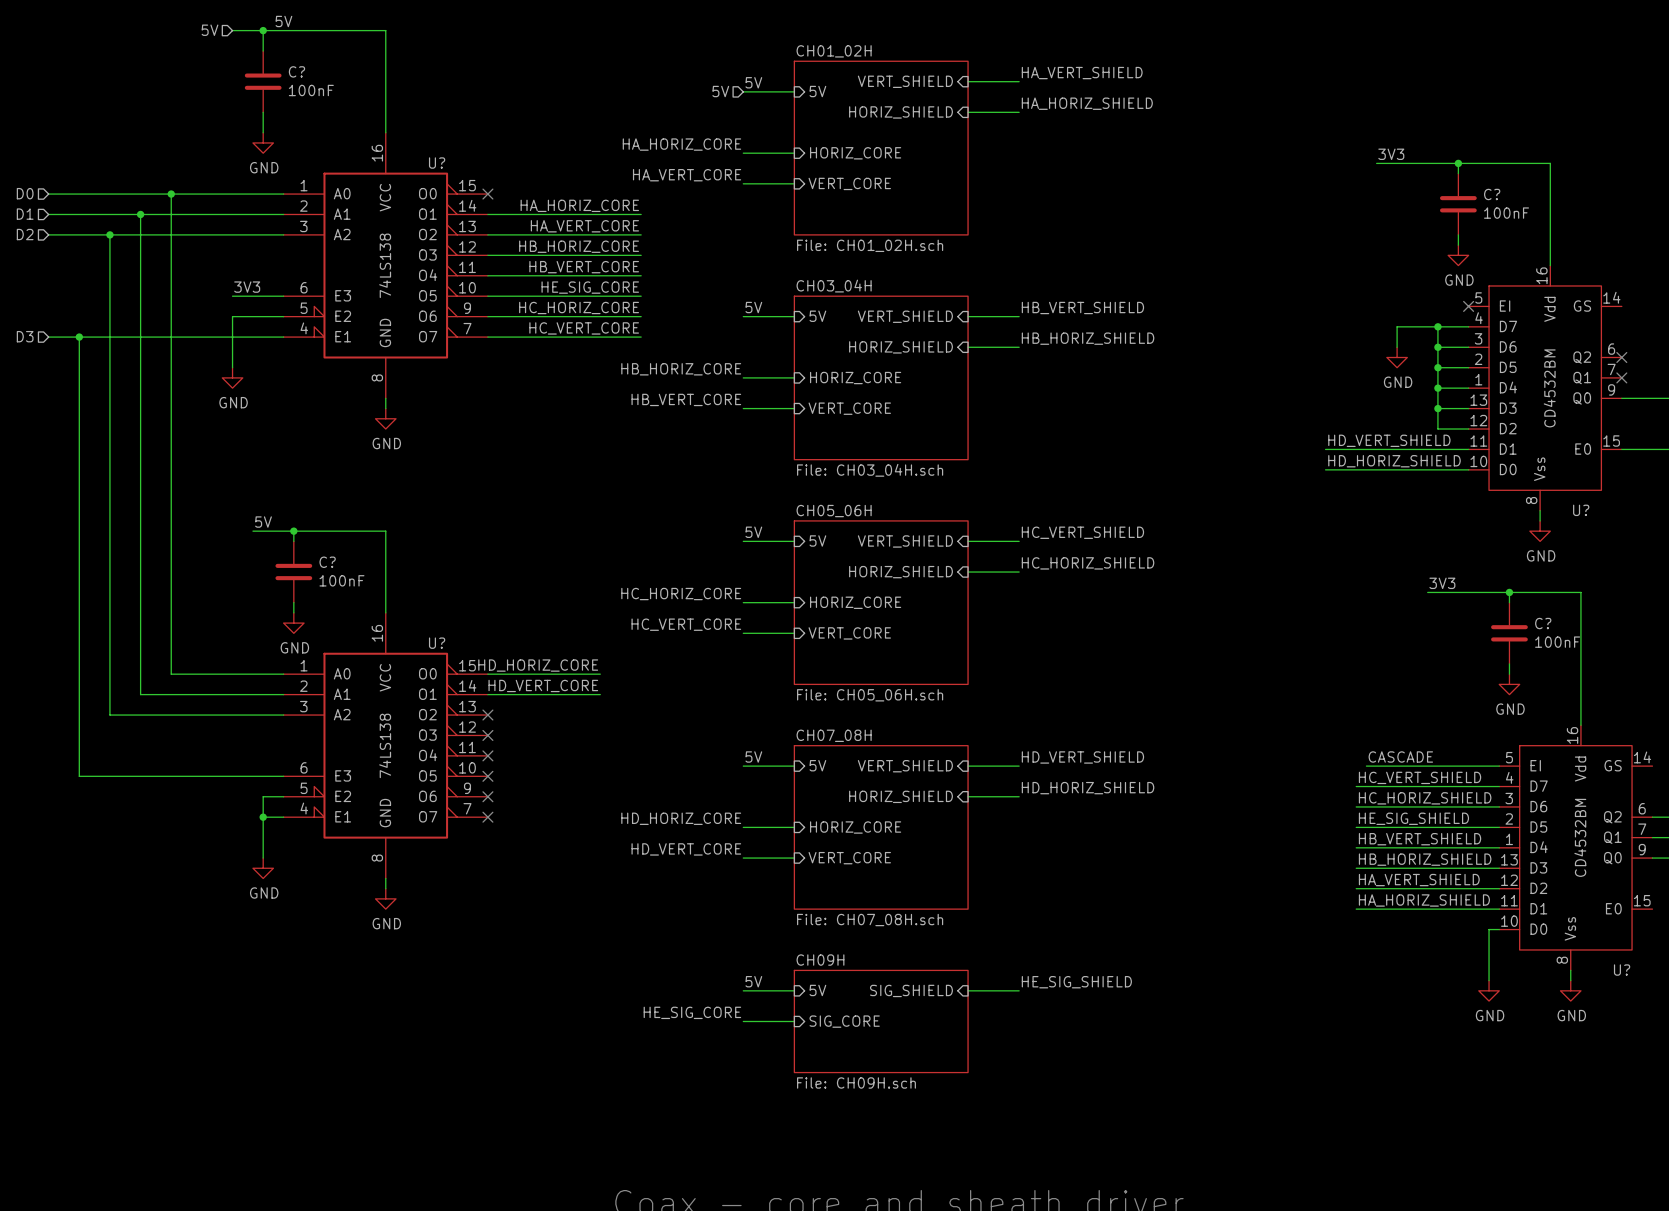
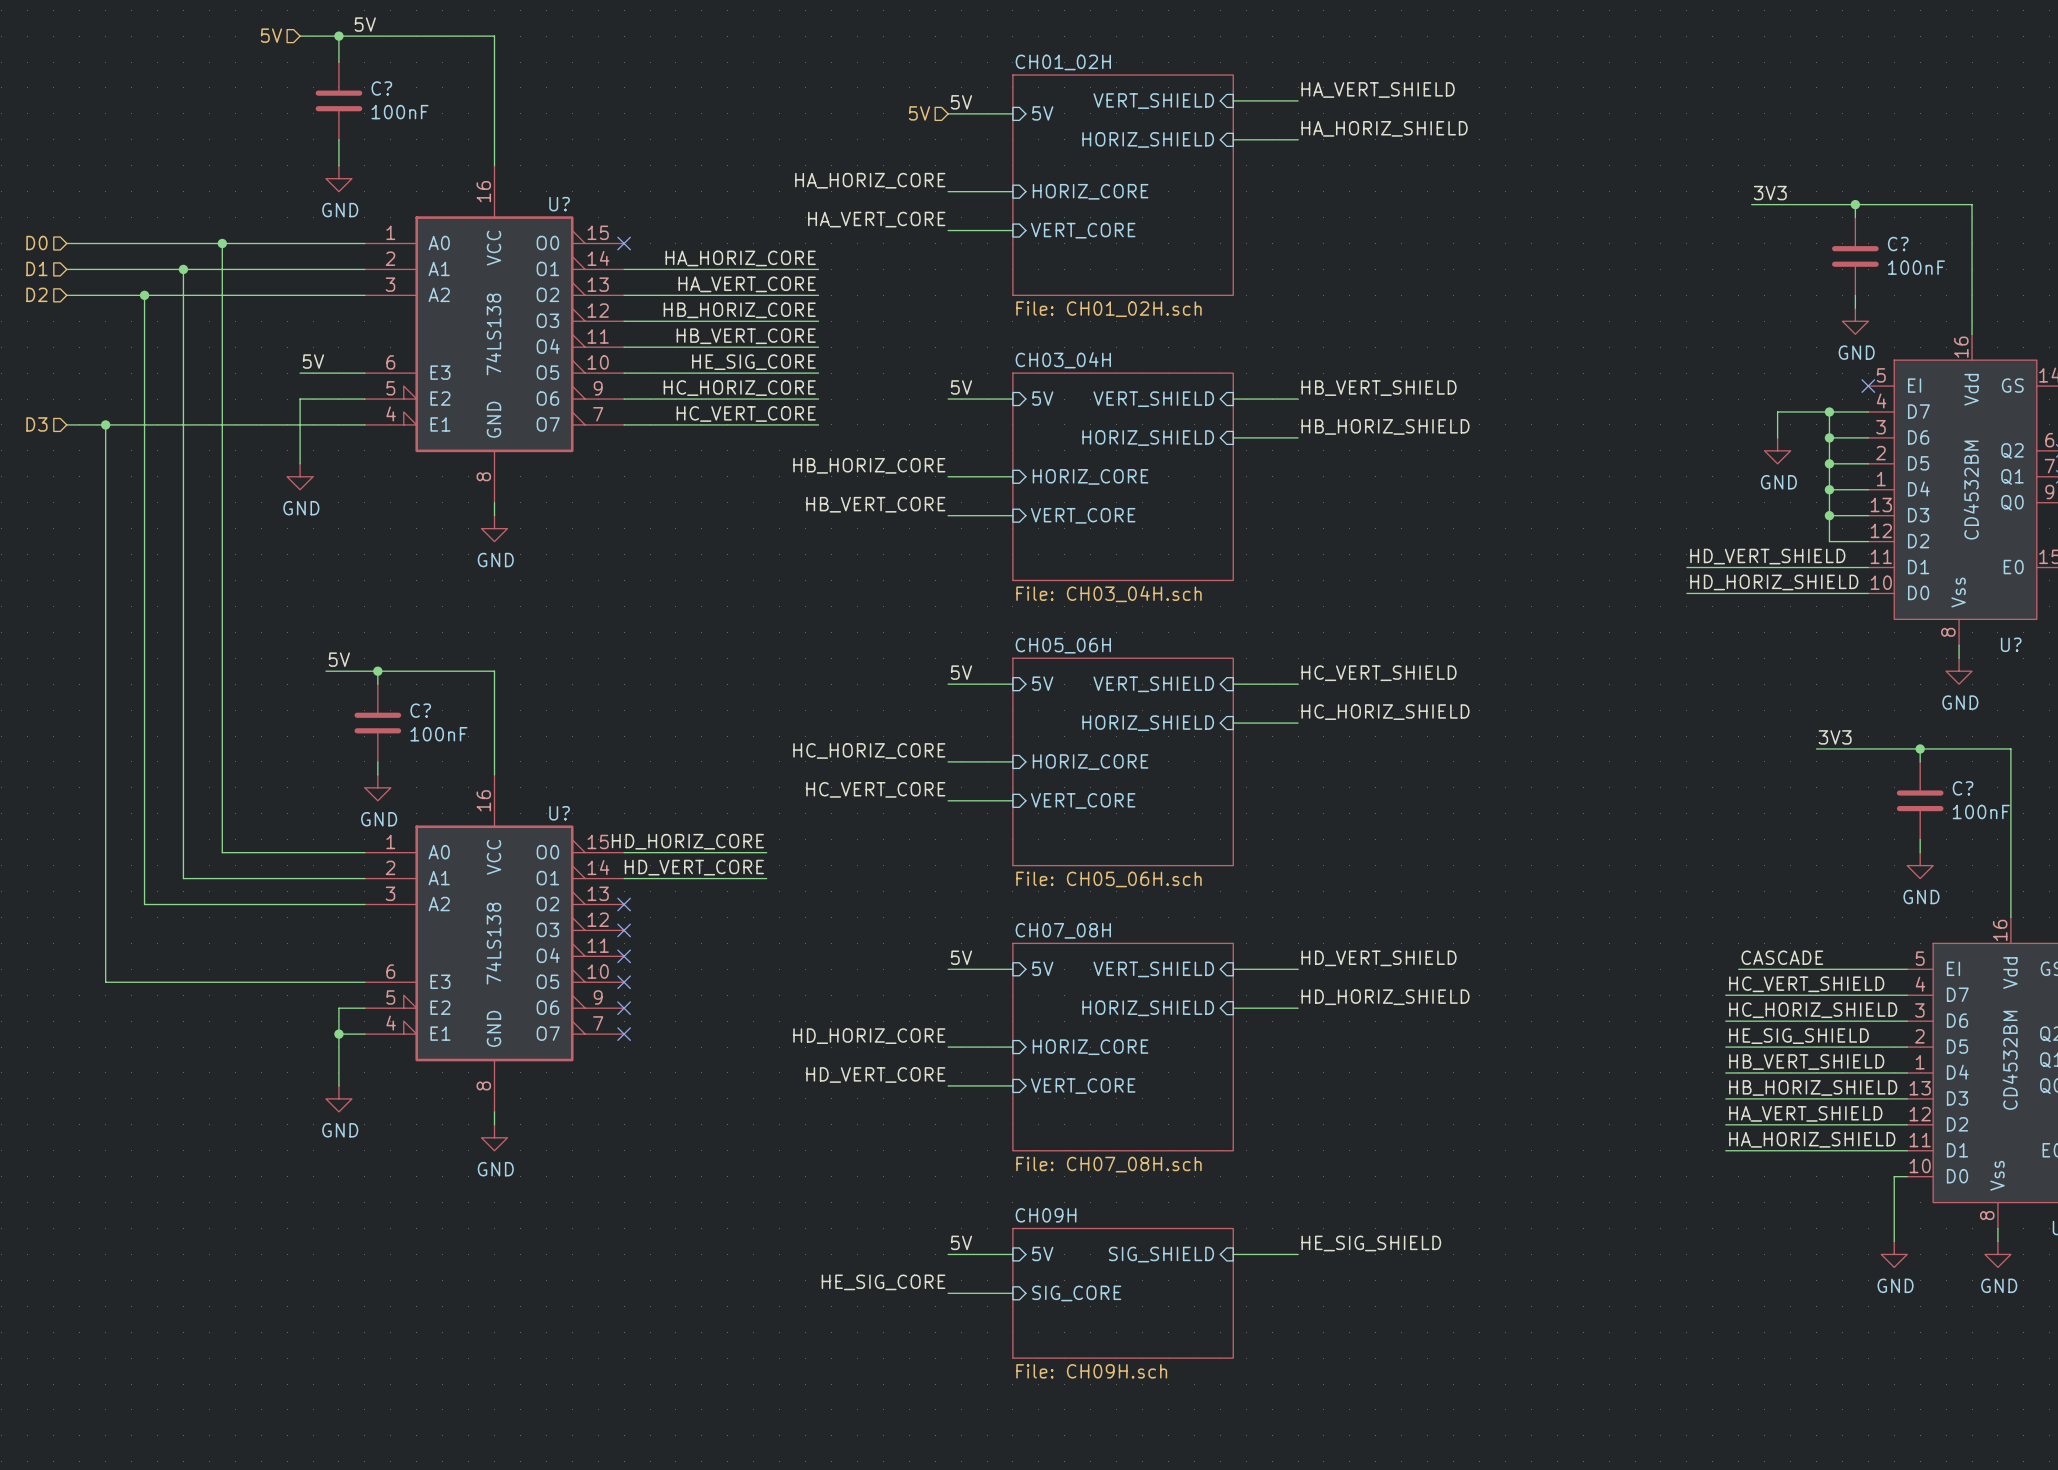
label: 3V3 (247, 287) -> 5V (313, 361)

